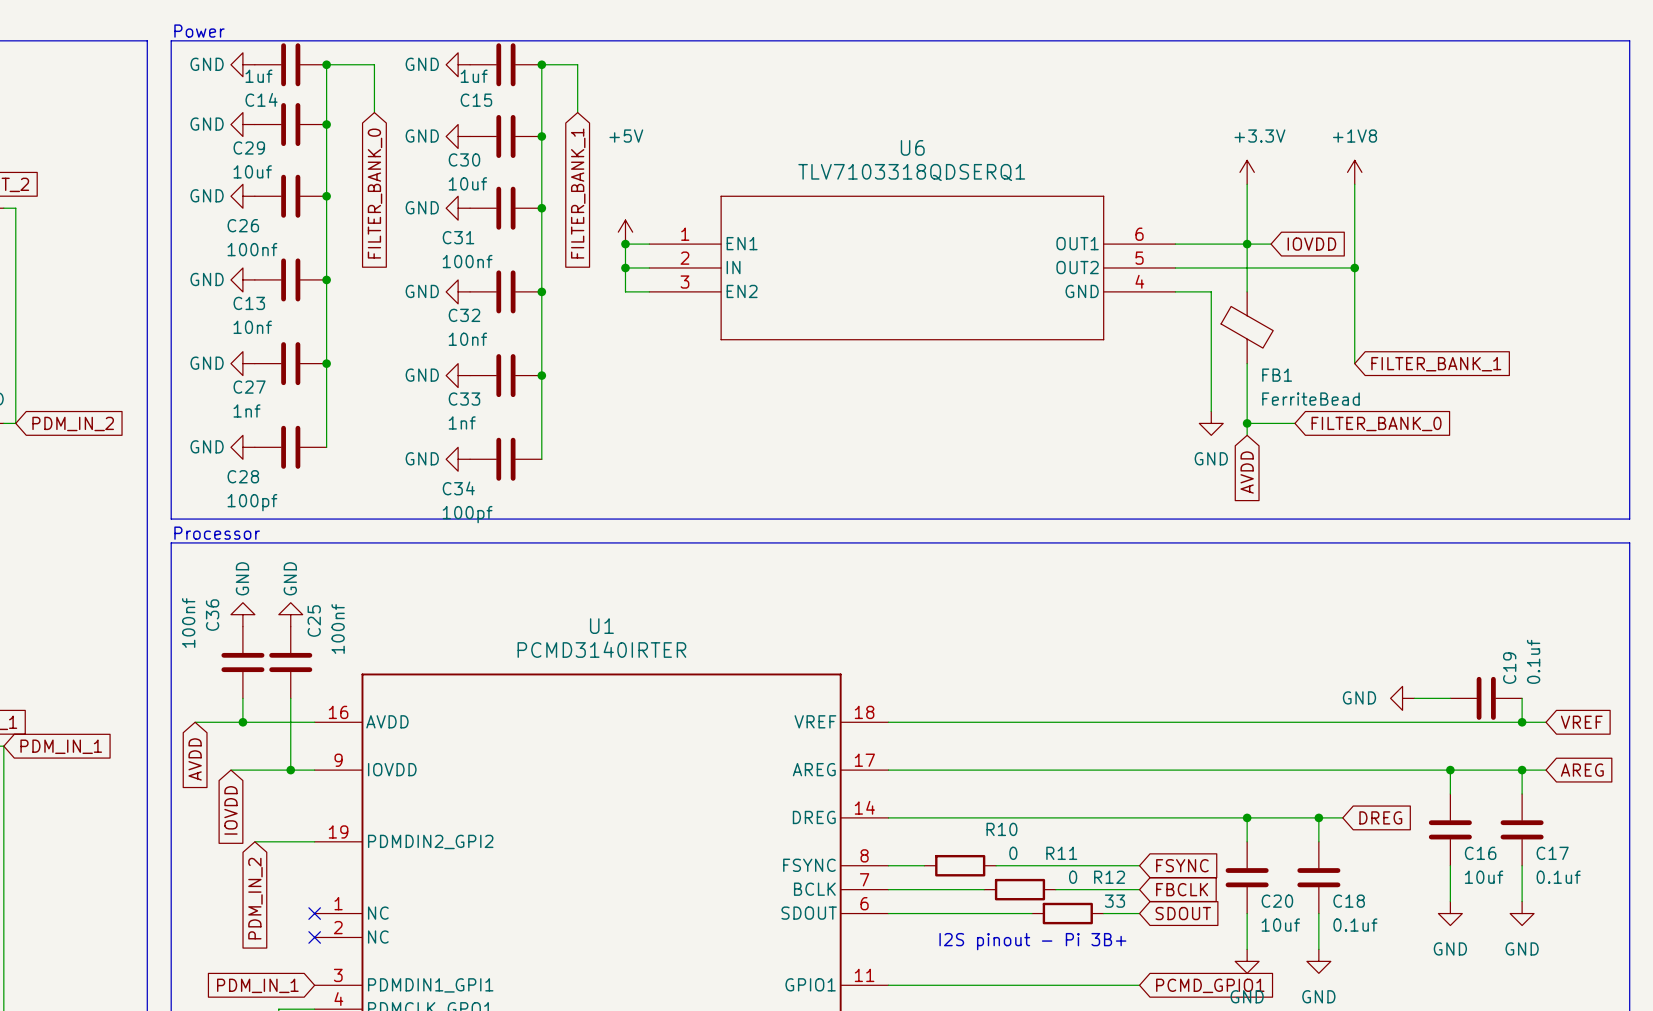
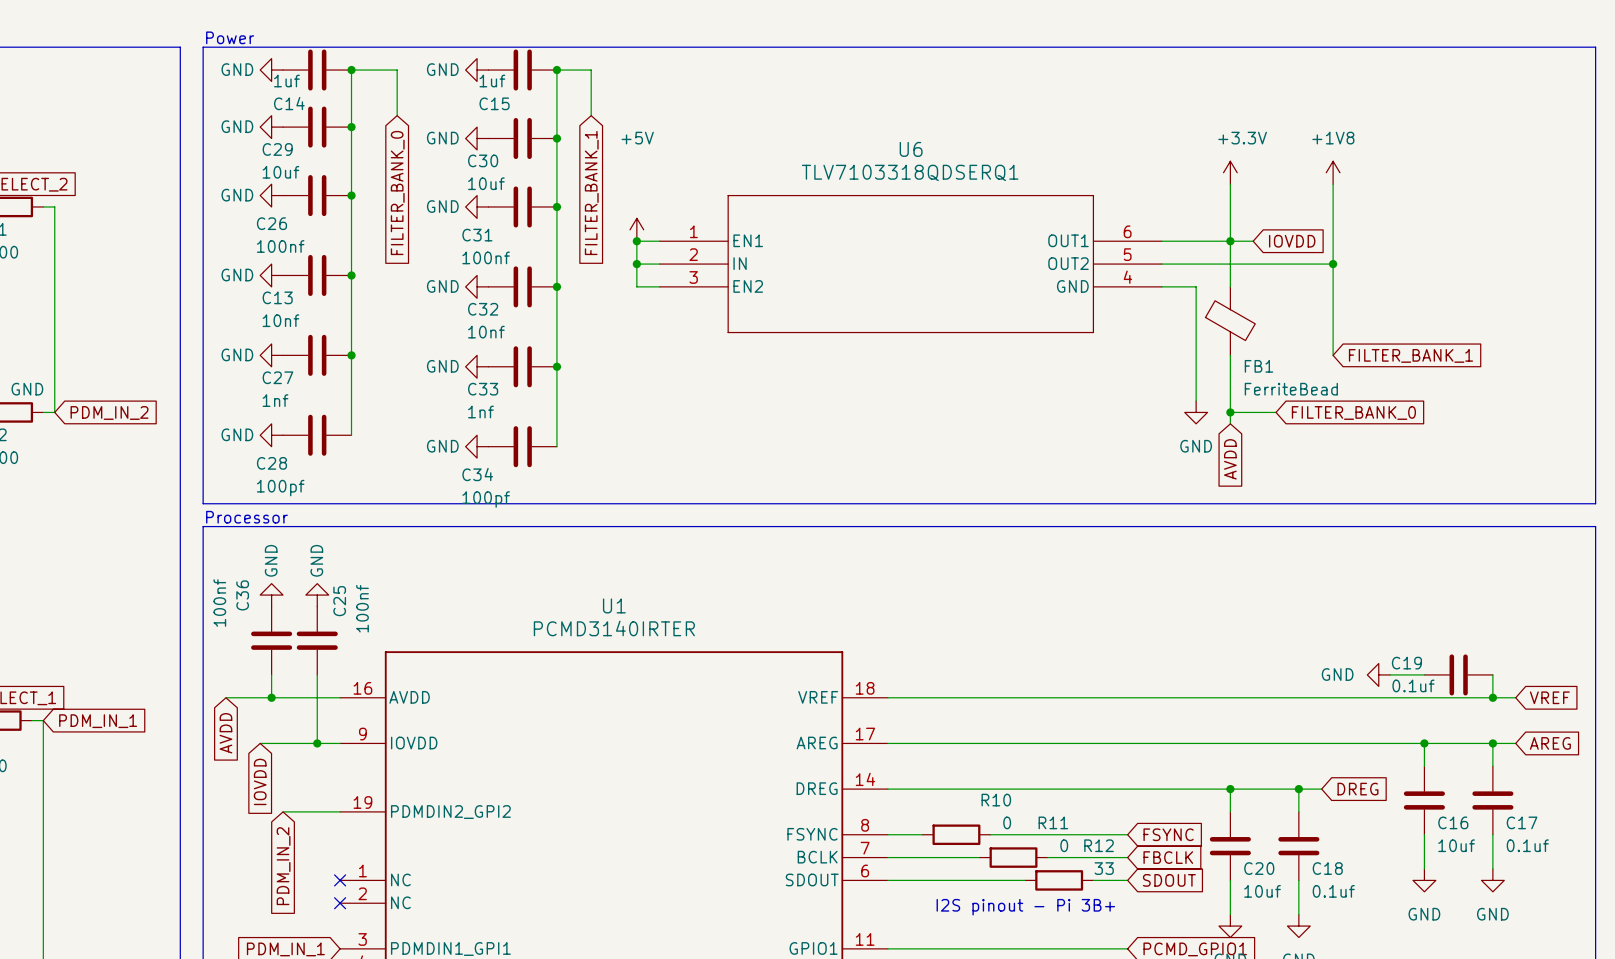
C19 value rotation: 0° (1533, 661) -> 90° clockwise (1413, 685)
C19 value position: 0.1uf (1533, 661) -> 0.1uf (1413, 685)
C19 name rotation: 0° (1509, 668) -> 90° clockwise (1406, 663)
C19 name position: C19 (1509, 668) -> C19 (1406, 663)

